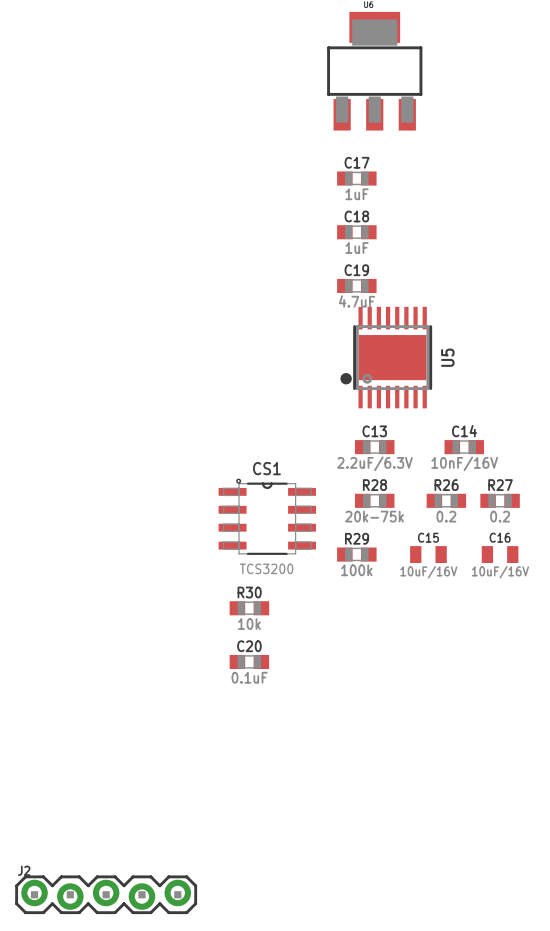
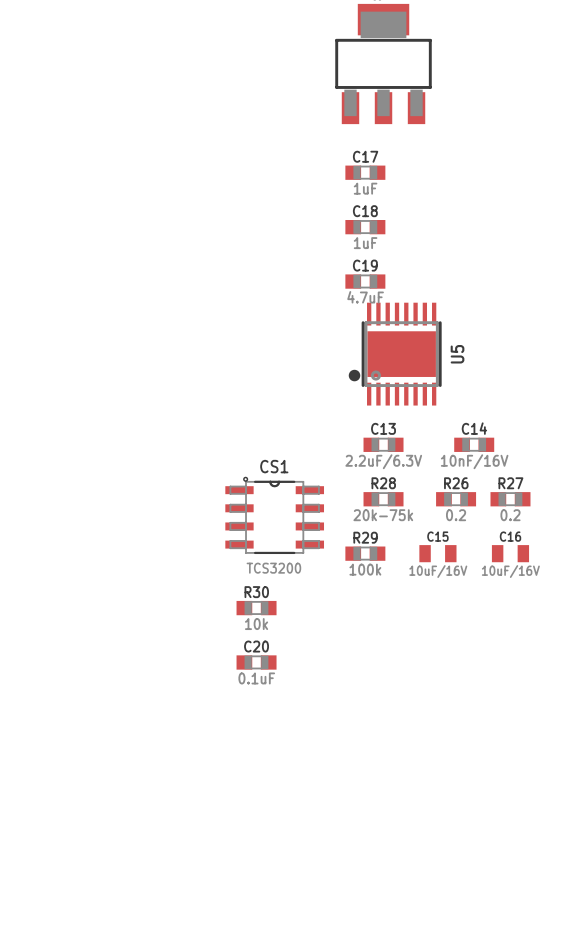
J2: (106, 894) -> none

